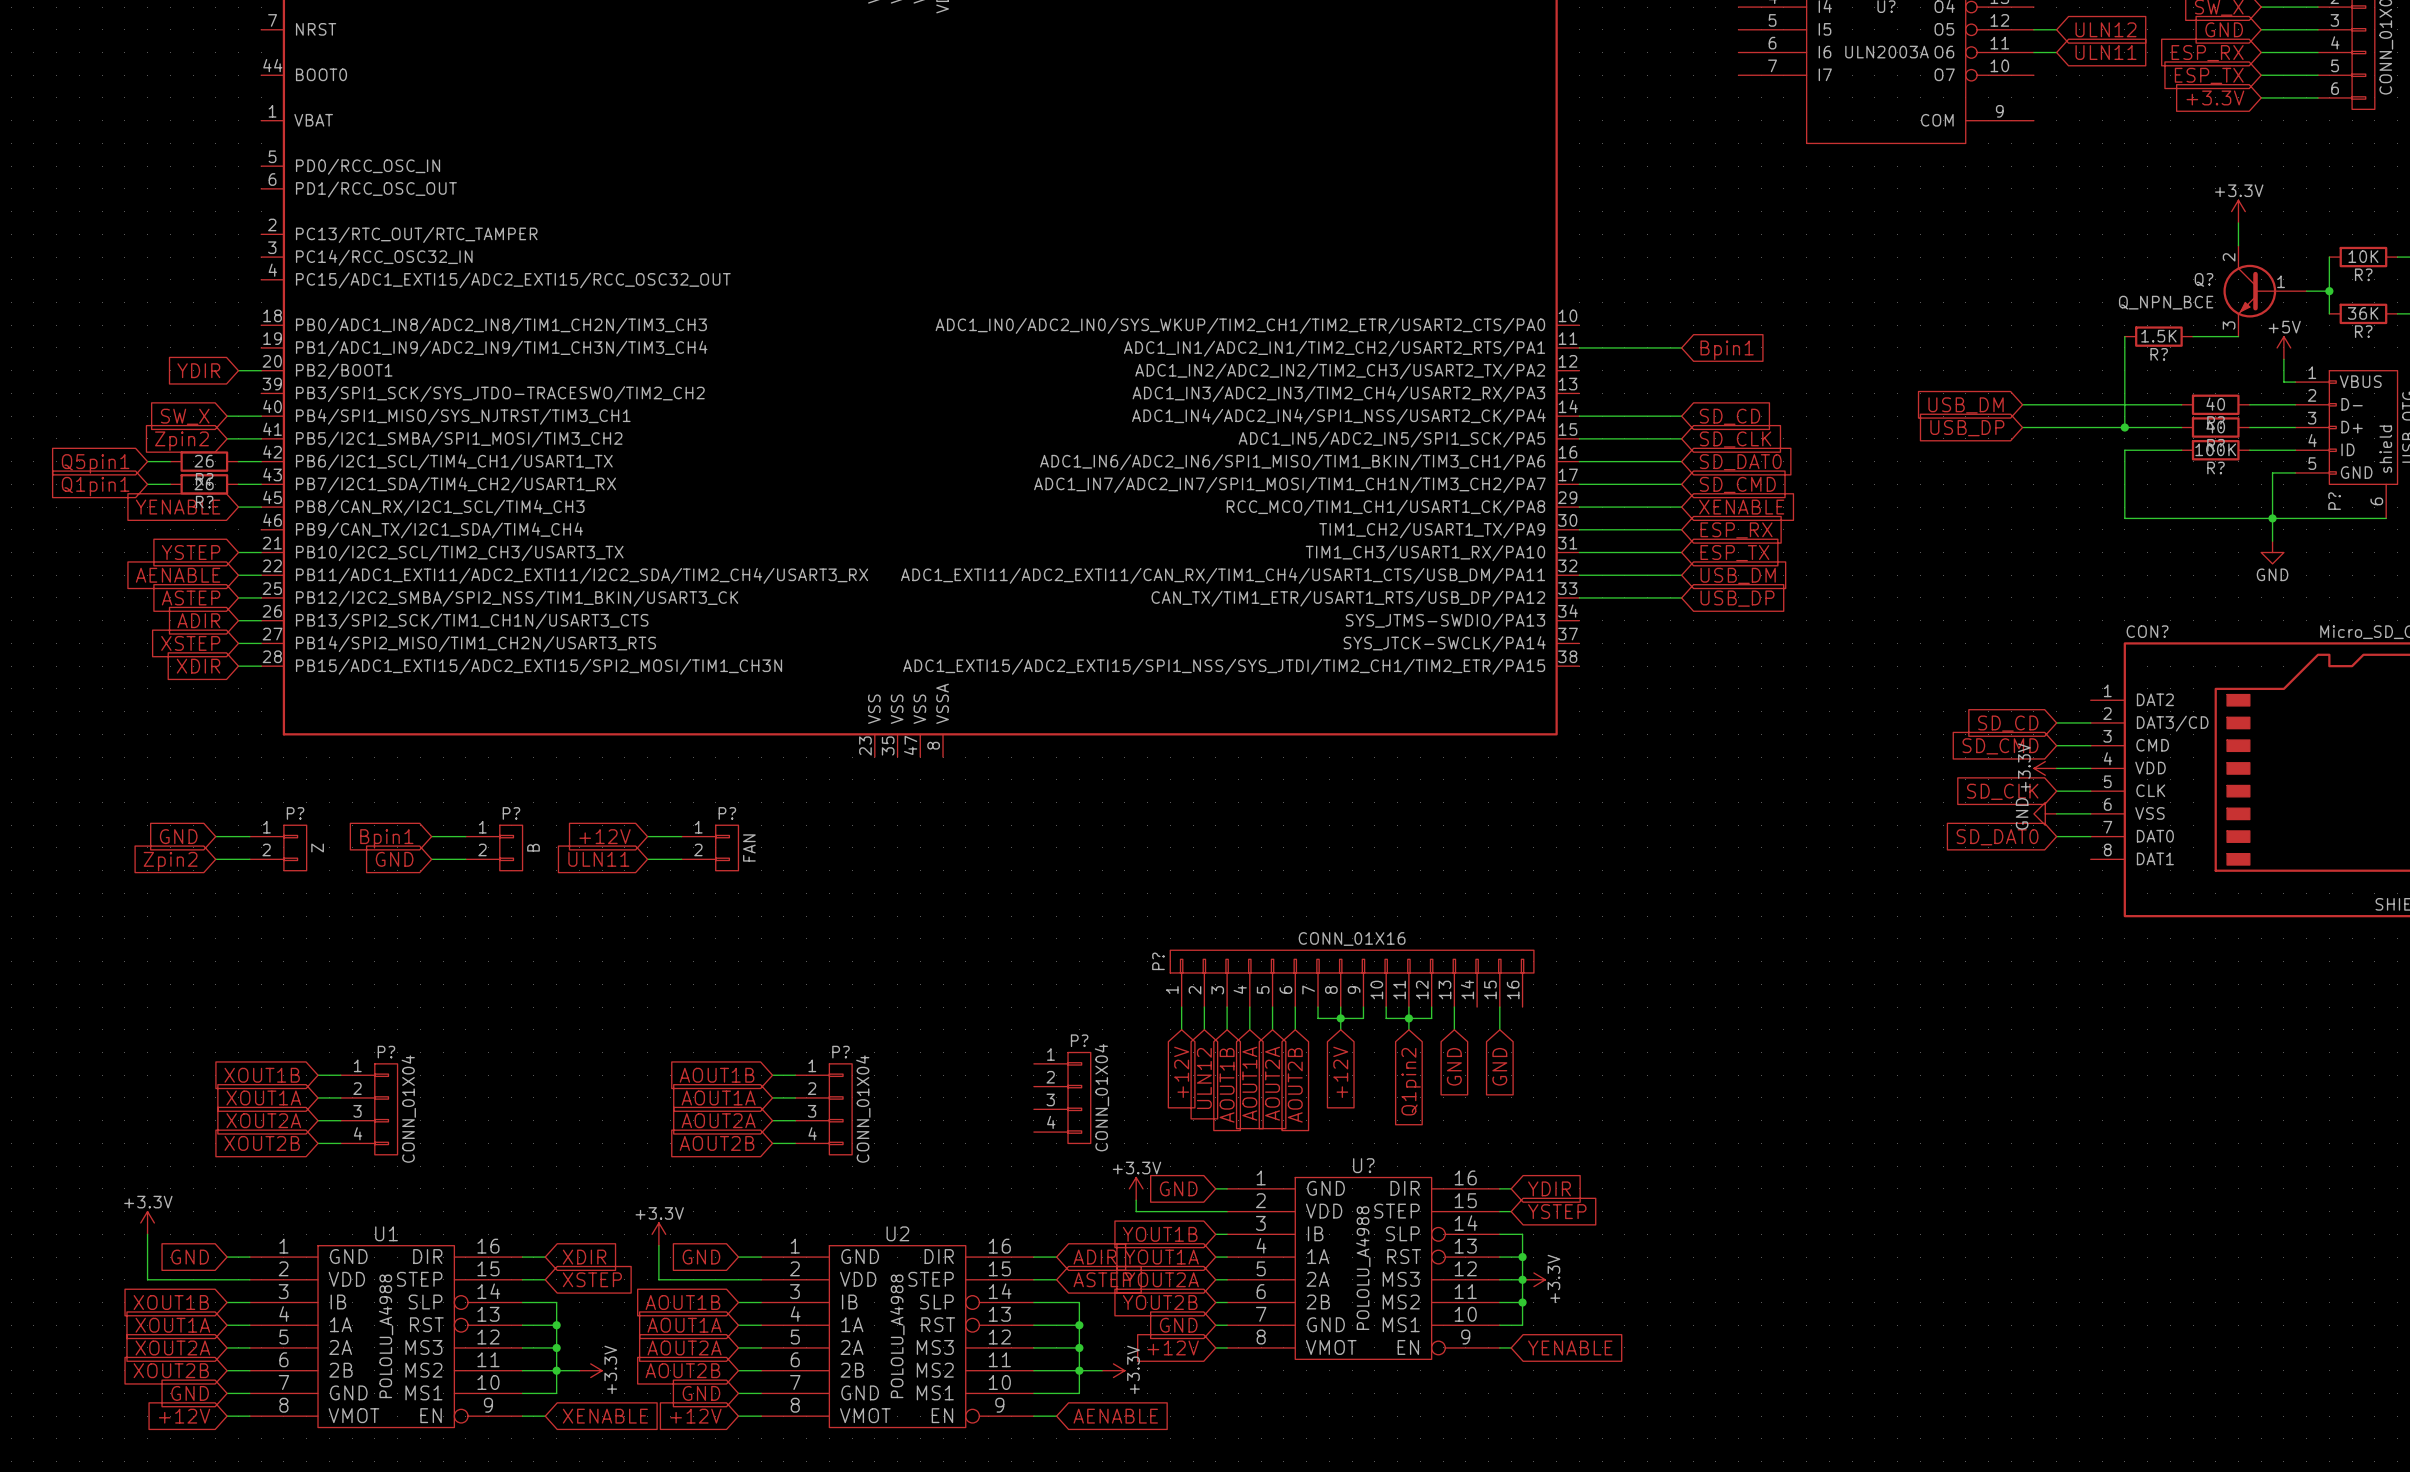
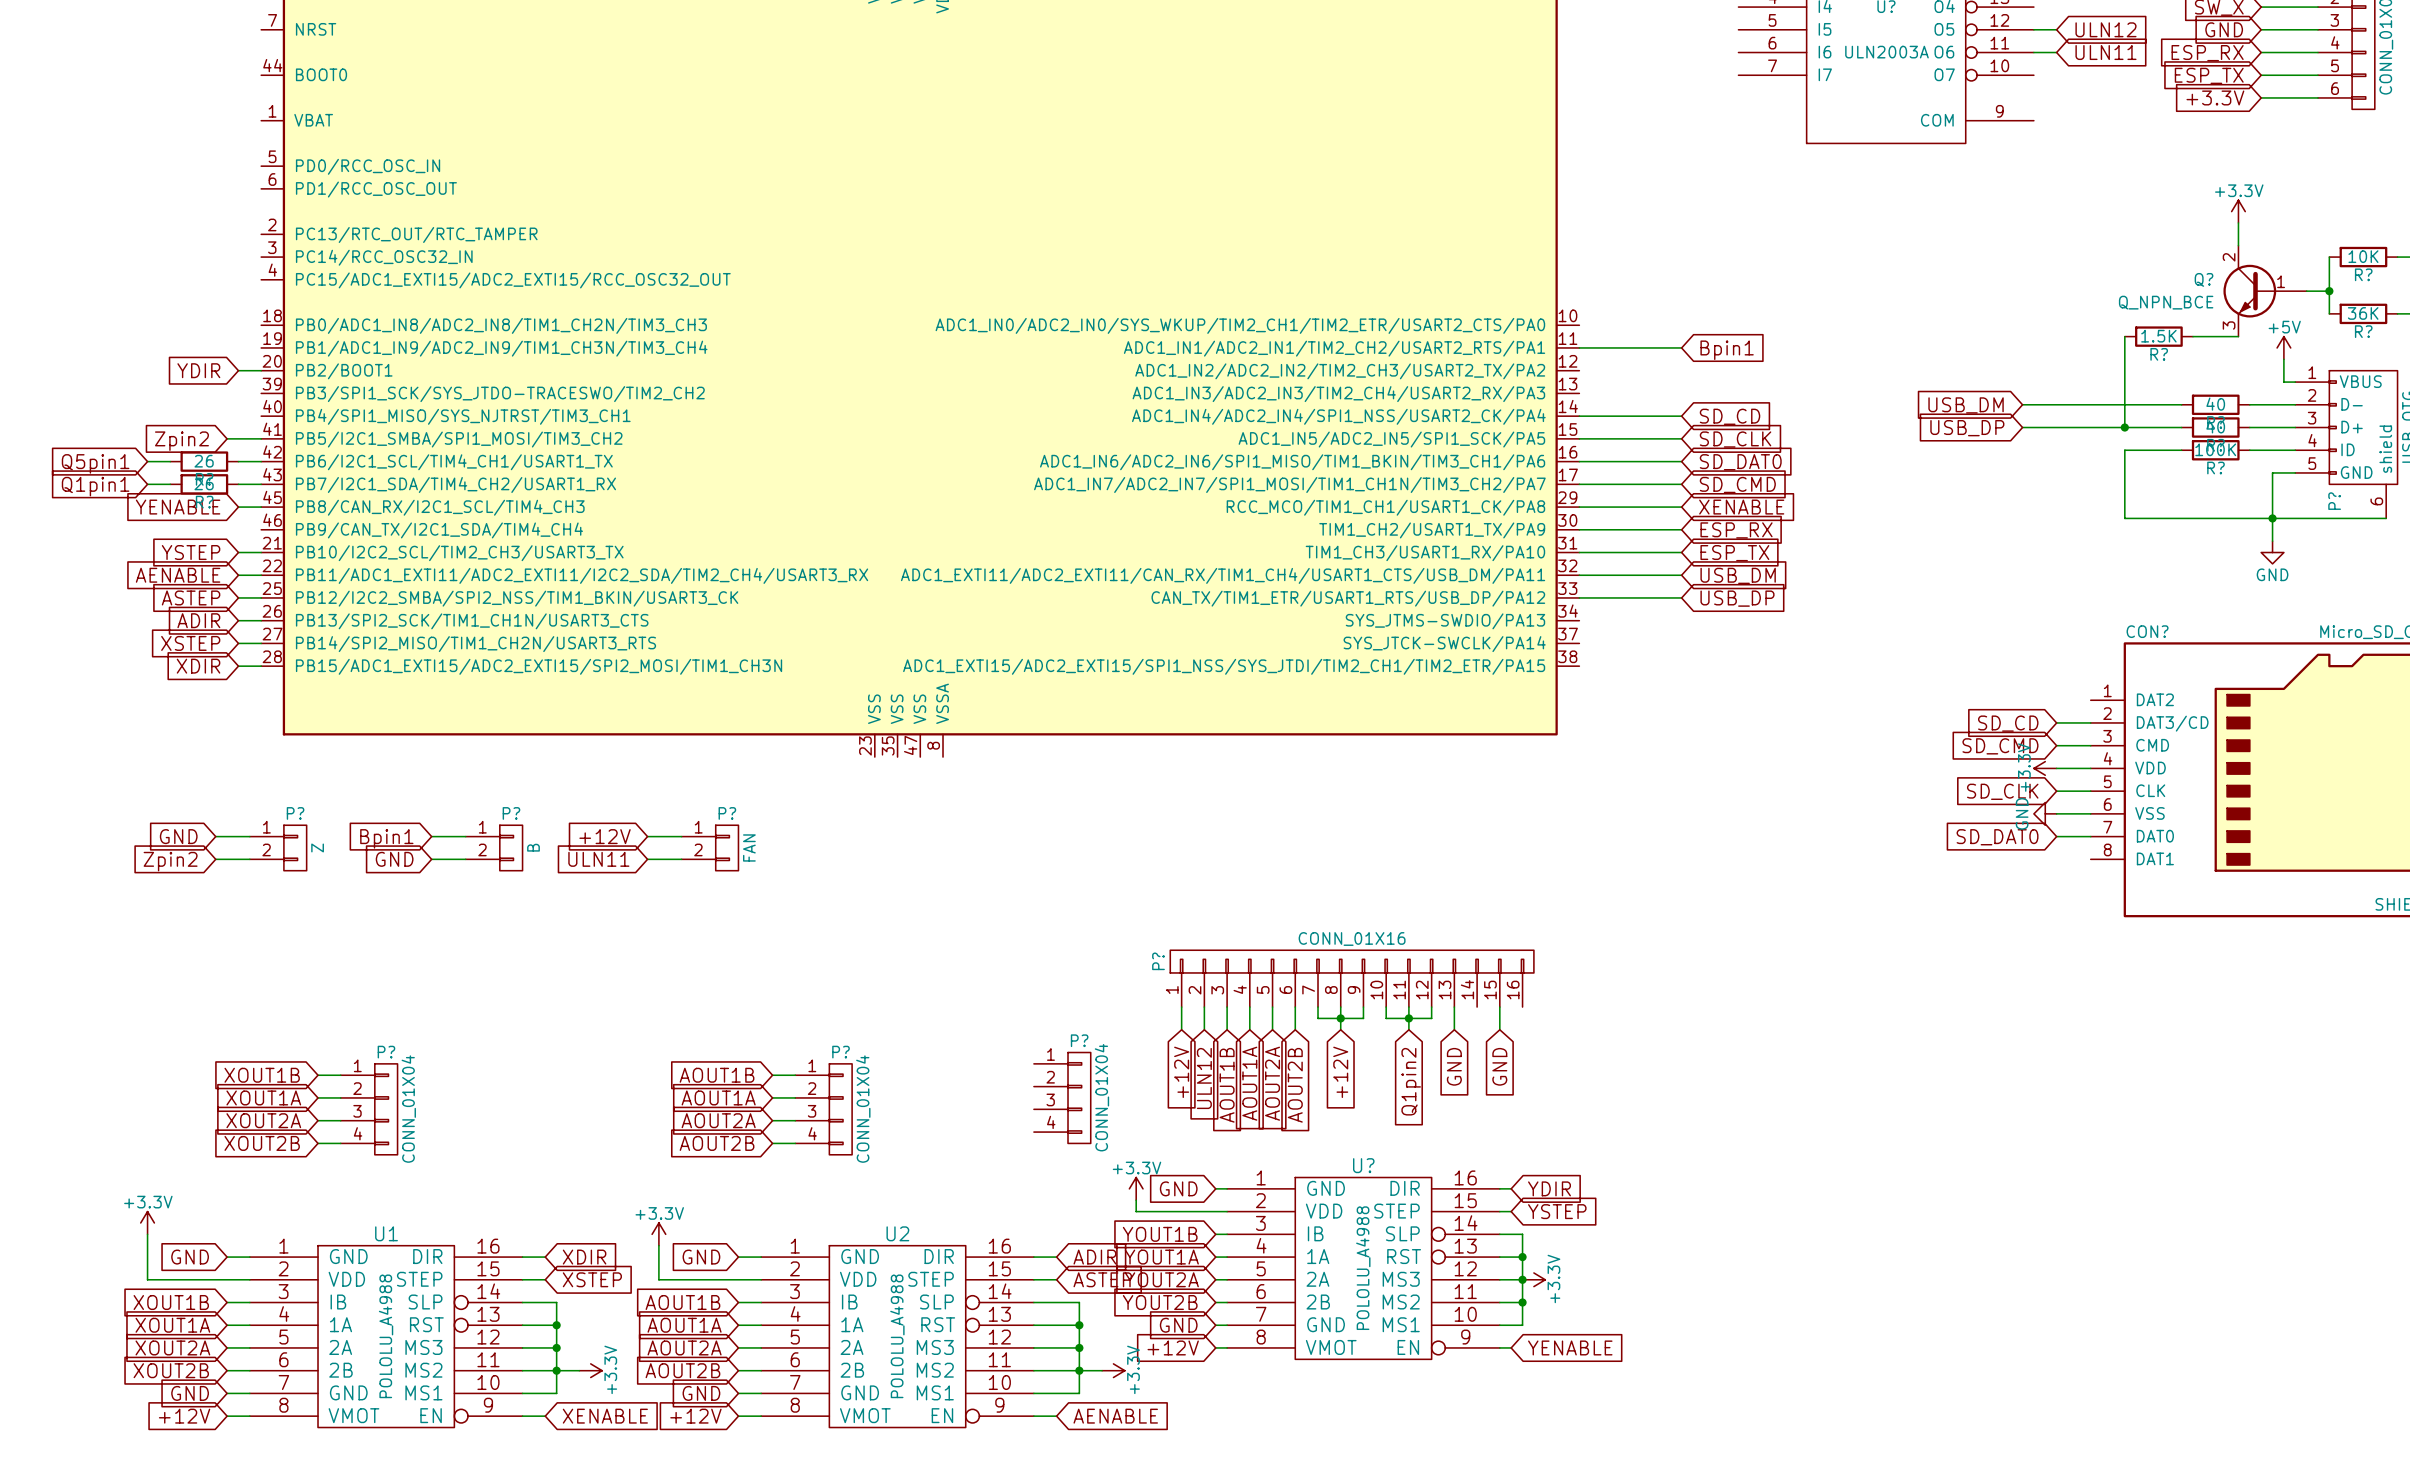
global label: SW_X (185, 416) -> none
wire: (227, 416) (261, 416) -> none

